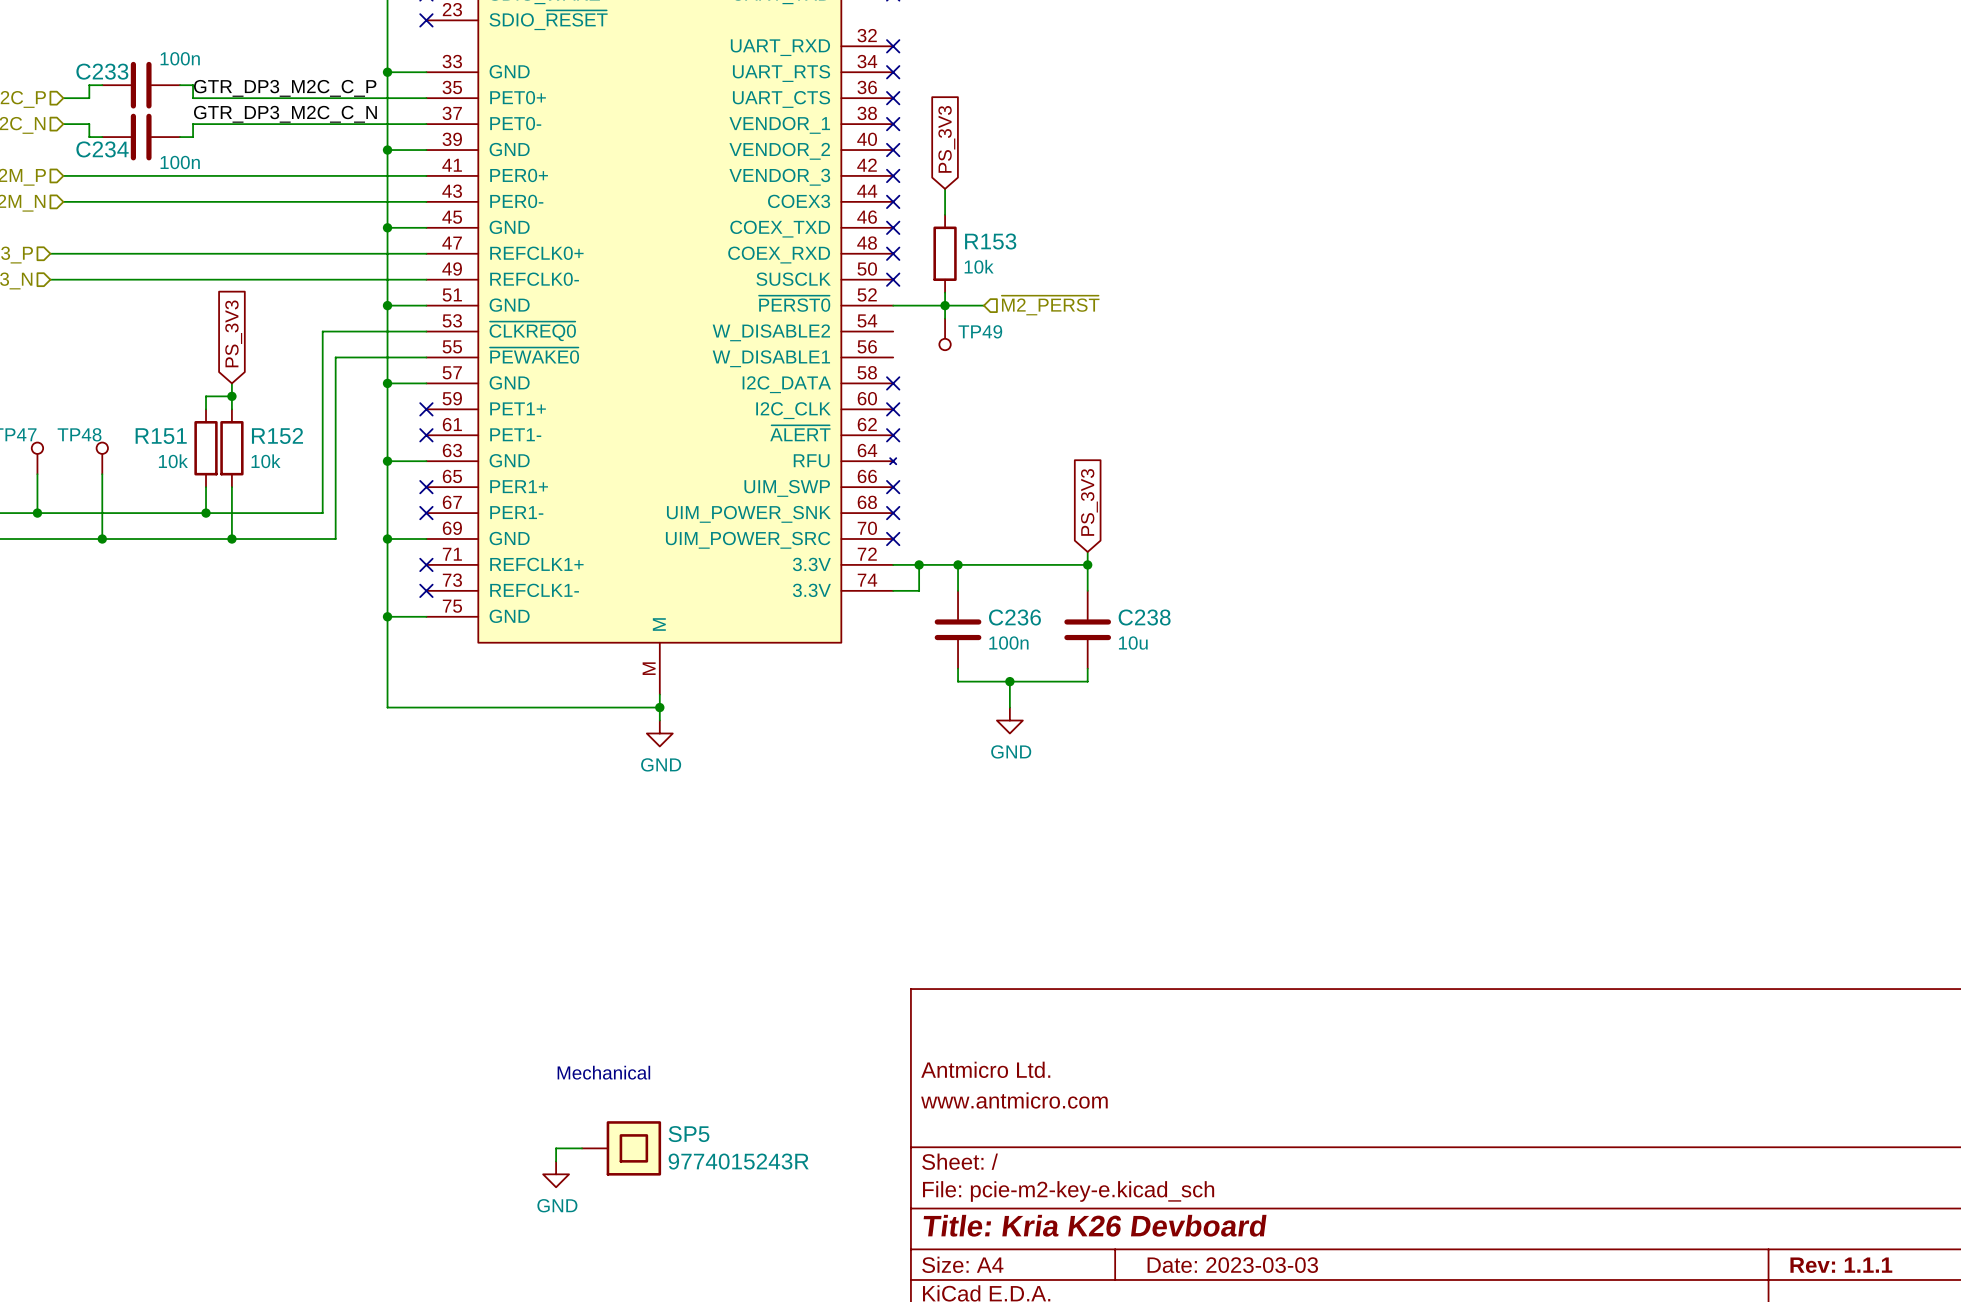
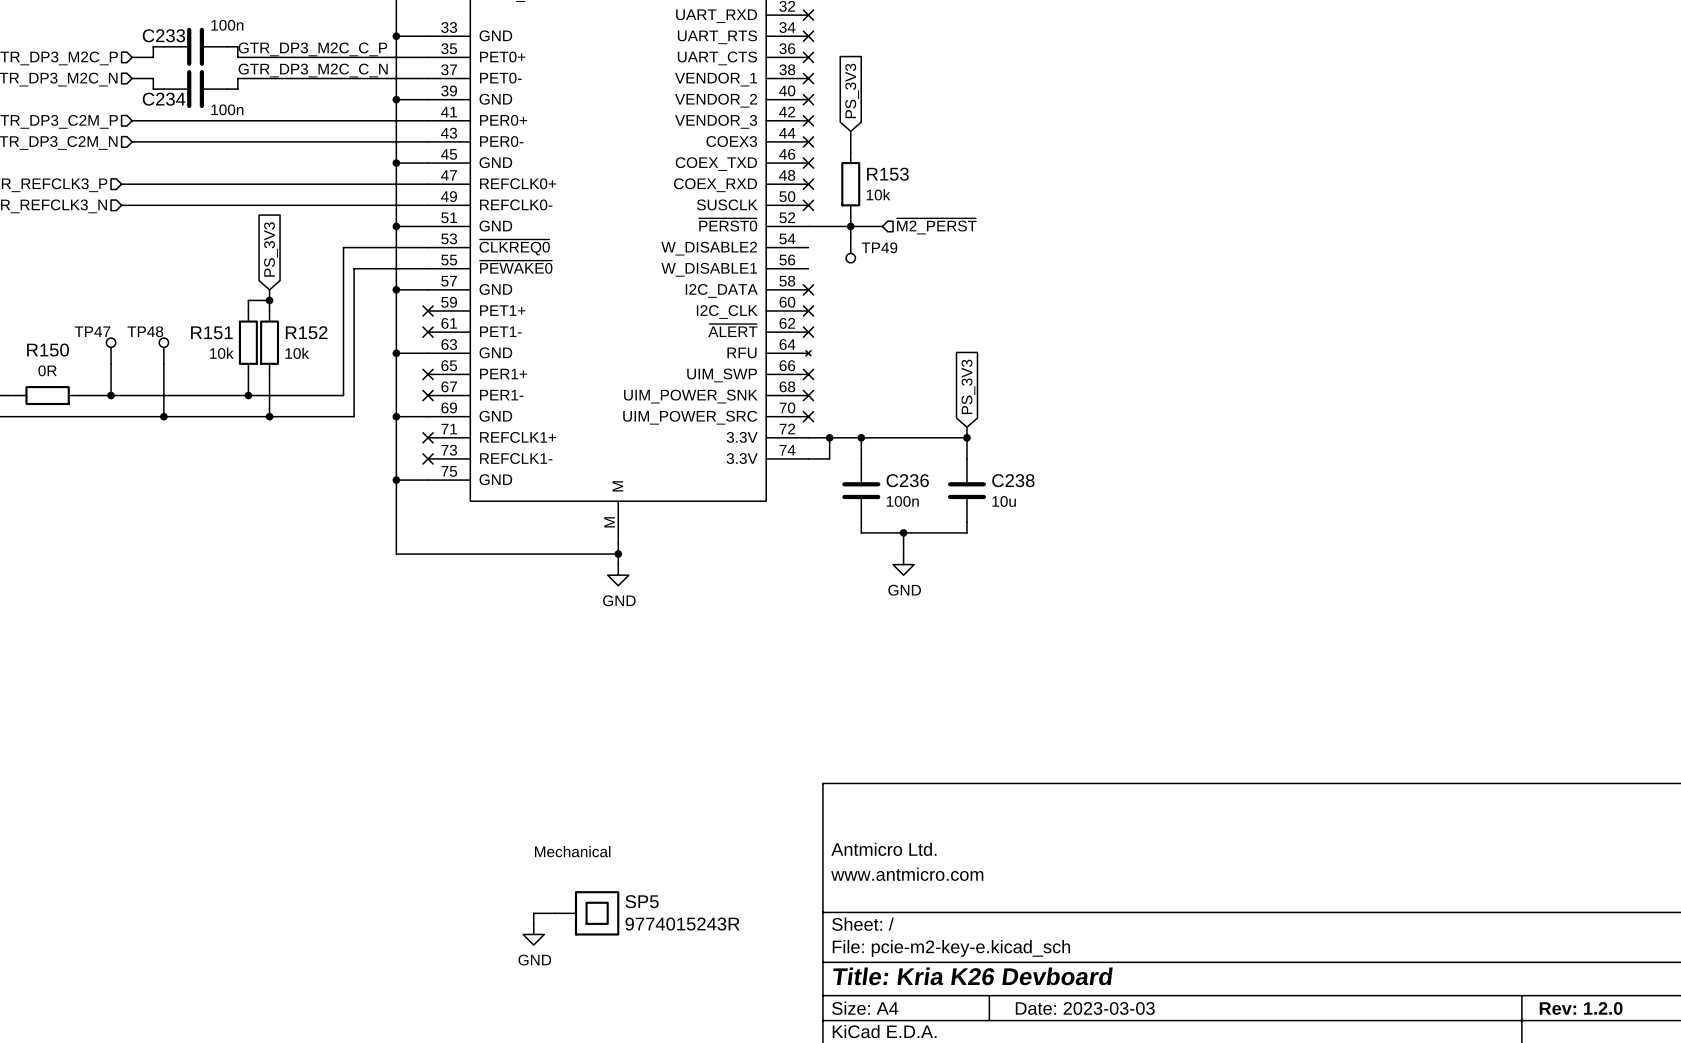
title block: Rev: 1.1.1 (1841, 1265) -> Rev: 1.2.0 (1581, 1008)

